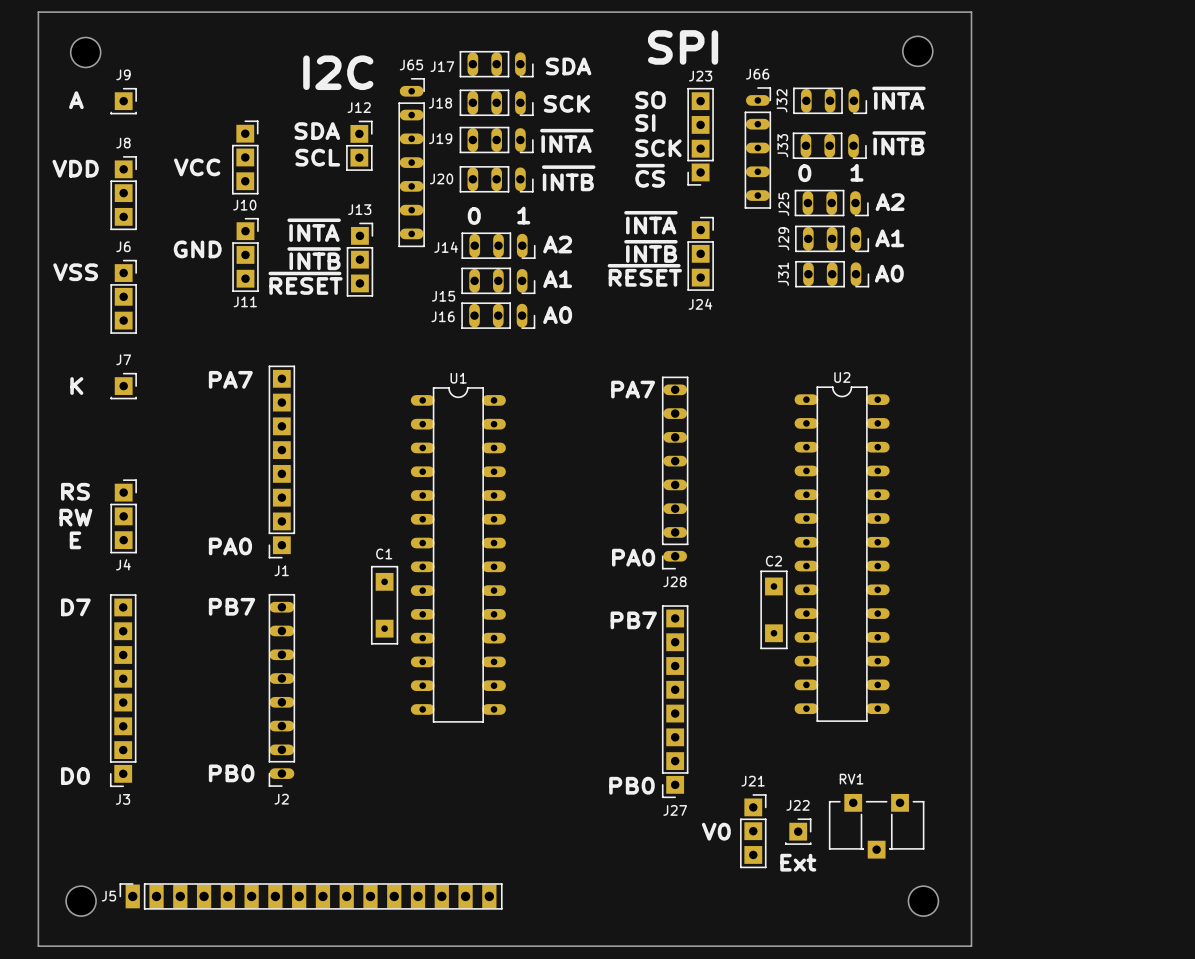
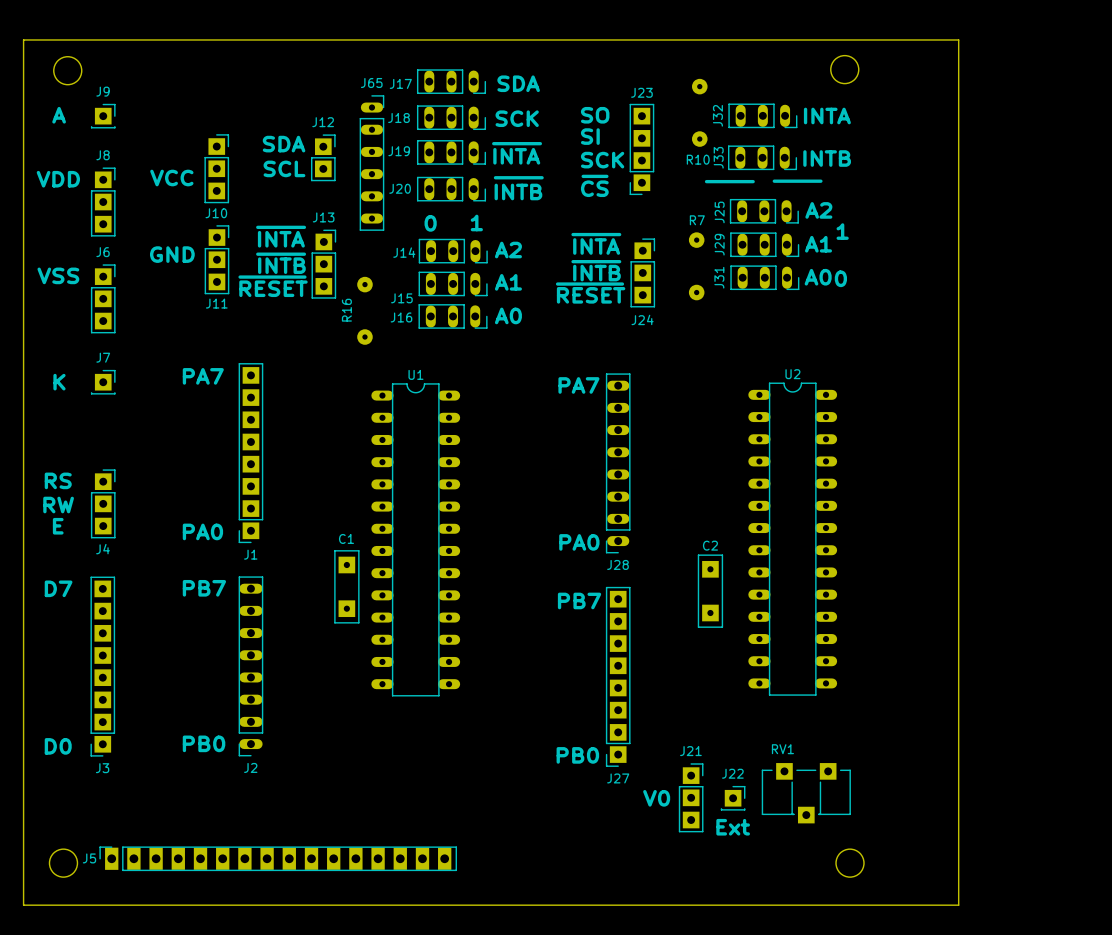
board edge: (38, 19) (38, 12) (971, 12) (971, 946) -> (23, 39) (958, 39) (958, 905) (894, 905)
text: SPI (683, 47) -> none
text: I2C (338, 72) -> none
J65 footprint: [398, 78, 425, 247] -> [359, 95, 385, 231]
line: (874, 88) (923, 88) -> (706, 181) (753, 181)
R10: none -> (699, 112)
line: (874, 133) (924, 133) -> (774, 181) (820, 181)
J66: (757, 147) -> none
text position: 1 (856, 172) -> 1 (842, 231)
text position: 0 (804, 173) -> 0 (840, 278)
line: (625, 212) (675, 212) -> (573, 234) (619, 234)
text position: INTA (651, 225) -> INTA (596, 246)
line: (625, 241) (675, 241) -> (573, 261) (619, 261)
text position: INTB (651, 253) -> INTB (596, 273)
J24 position: (700, 253) -> (642, 272)
R7: none -> (696, 266)
line: (609, 265) (678, 265) -> (557, 284) (622, 284)
text position: RESET (645, 277) -> RESET (591, 295)
R16: none -> (364, 310)
U2 position: (842, 554) -> (792, 539)

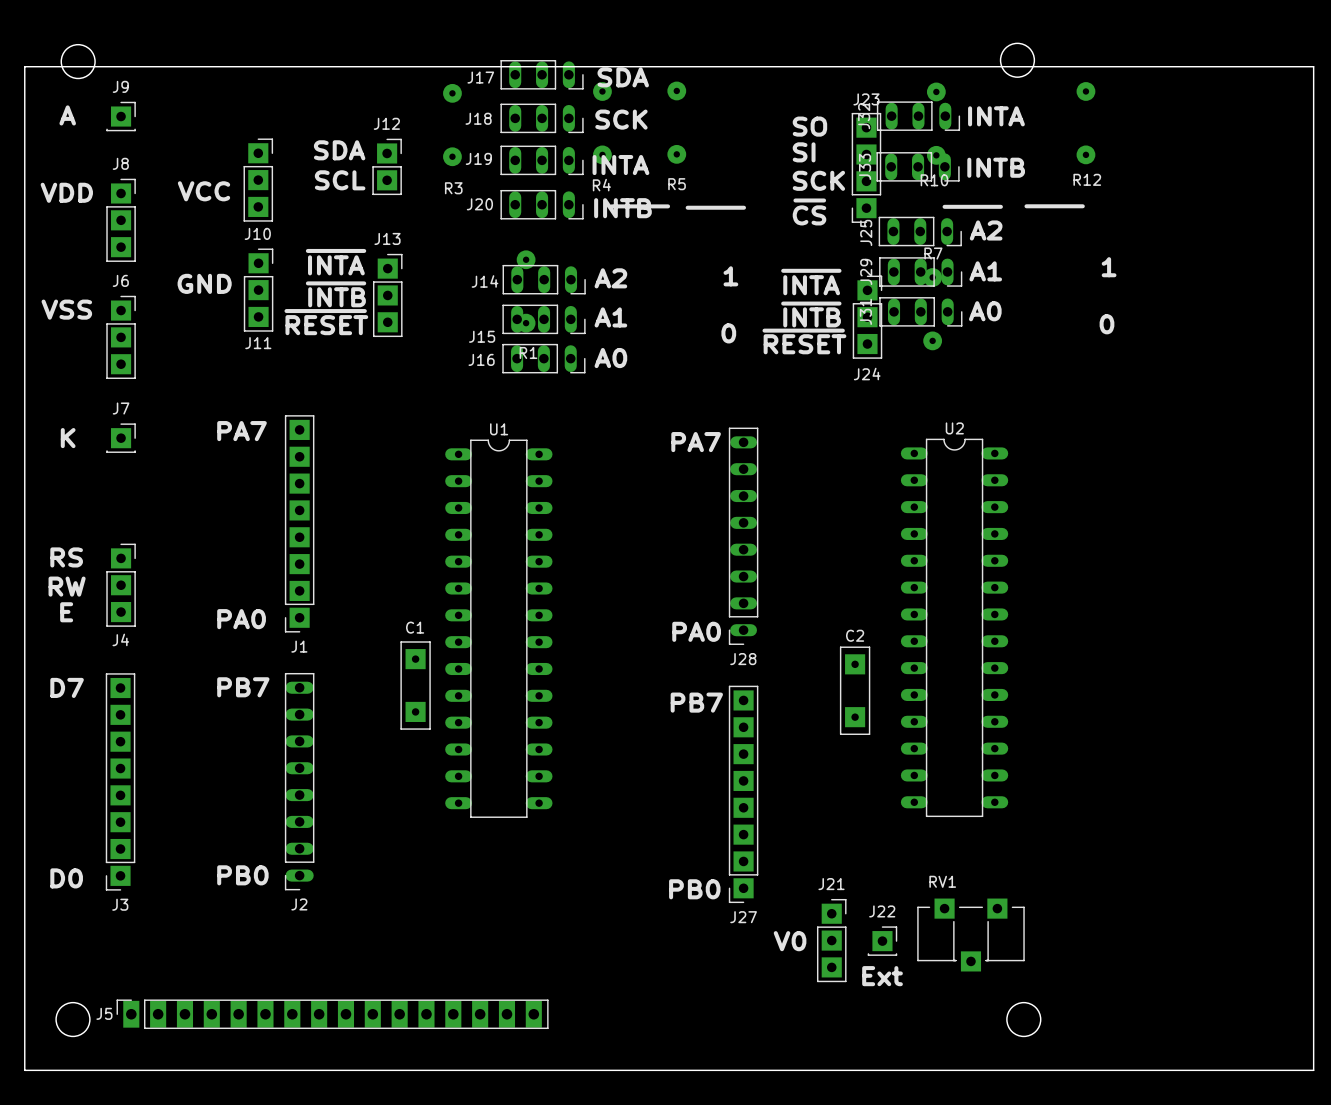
board edge: (23, 74) (23, 39) (958, 39) (958, 905) -> (24, 66) (1313, 66) (1313, 1070) (1155, 1070)
R10 position: (699, 112) -> (936, 123)
text position: SO (595, 115) -> SO (809, 126)
R4: none -> (602, 123)
R5: none -> (676, 122)
R12: none -> (1085, 123)
R3: none -> (452, 125)
text position: SI (590, 136) -> SI (804, 152)
line: (493, 143) (540, 143) -> (687, 207) (743, 207)
J23 position: (641, 149) -> (866, 167)
text position: SCK (602, 160) -> SCK (818, 180)
J65: (371, 163) -> none
line: (583, 176) (606, 176) -> (795, 200) (824, 200)
line: (495, 177) (542, 177) -> (611, 206) (668, 206)
line: (706, 181) (753, 181) -> (944, 206) (1000, 206)
line: (774, 181) (820, 181) -> (1026, 206) (1082, 206)
text position: CS (594, 188) -> CS (809, 215)
text: 1 (476, 222) -> none
text: 0 (430, 223) -> none
text position: 1 (842, 231) -> 1 (1109, 267)
line: (573, 234) (619, 234) -> (783, 270) (839, 270)
text position: INTA (596, 246) -> INTA (811, 285)
text: none -> 1 (730, 276)
R1: none -> (526, 291)
line: (573, 261) (619, 261) -> (783, 303) (839, 303)
R7 position: (696, 266) -> (932, 309)
J24 position: (642, 272) -> (867, 317)
text position: INTB (596, 273) -> INTB (812, 317)
text position: 0 (840, 278) -> 0 (1106, 324)
line: (557, 284) (622, 284) -> (764, 330) (842, 330)
text position: RESET (591, 295) -> RESET (804, 344)
text: none -> 0 (728, 333)
R16: (364, 310) -> none

